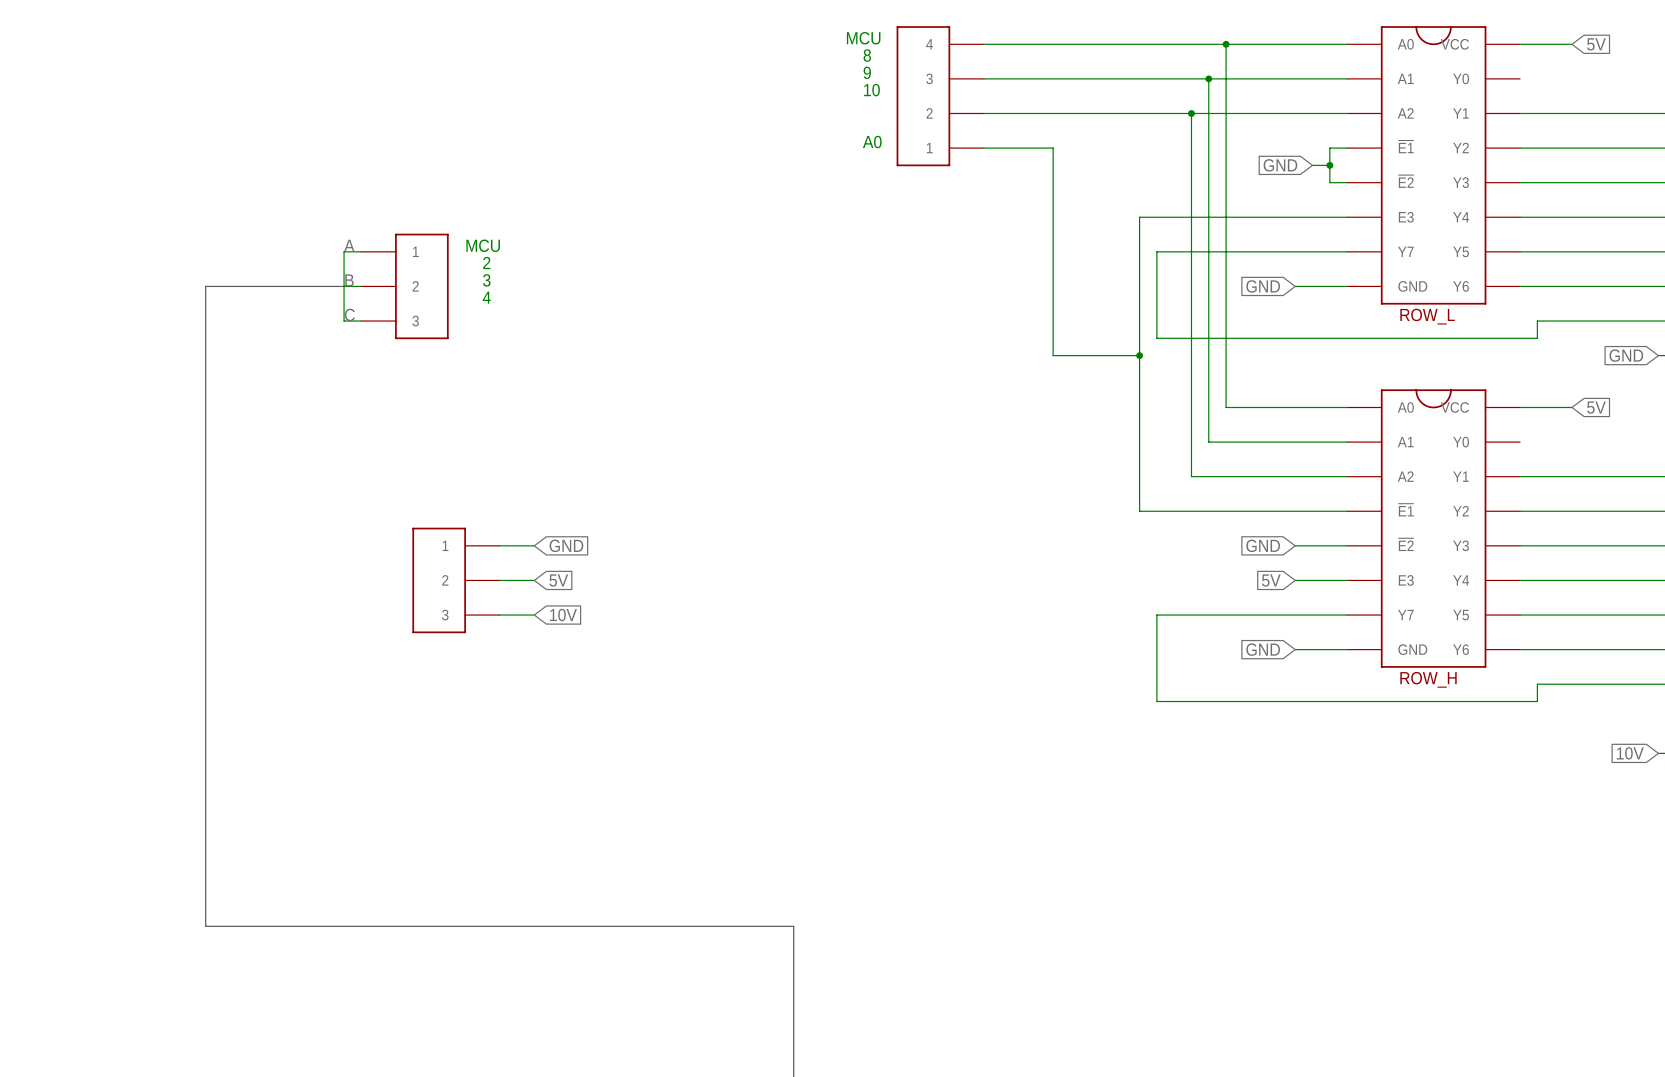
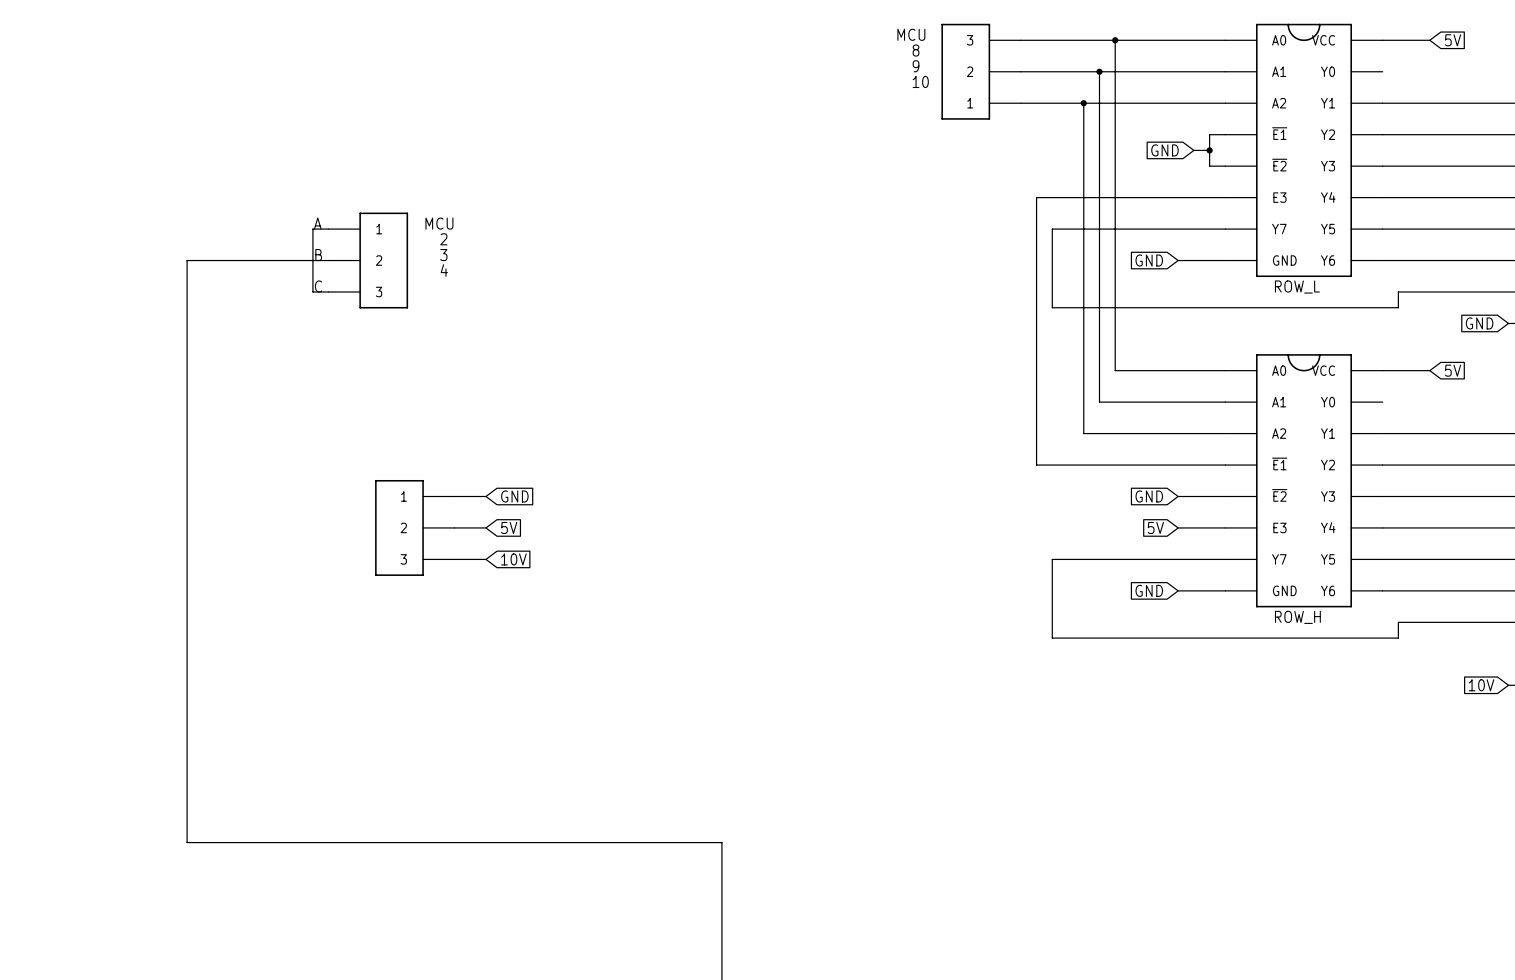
text position: MCU (863, 38) -> MCU (911, 34)
wire: (983, 44) (1122, 44) -> none
text position: 8 (867, 55) -> 8 (916, 50)
text position: 9 (867, 72) -> 9 (916, 66)
wire: (983, 78) (1122, 78) -> none
part: none -> (981, 71)
text position: 10 (871, 90) -> 10 (920, 81)
part: (940, 96) -> none
wire: (983, 113) (1122, 113) -> none
text: A0 (872, 142) -> none
wire: (983, 148) (1053, 148) (1053, 355) (1139, 355) -> none
junction: (1139, 355) -> none

